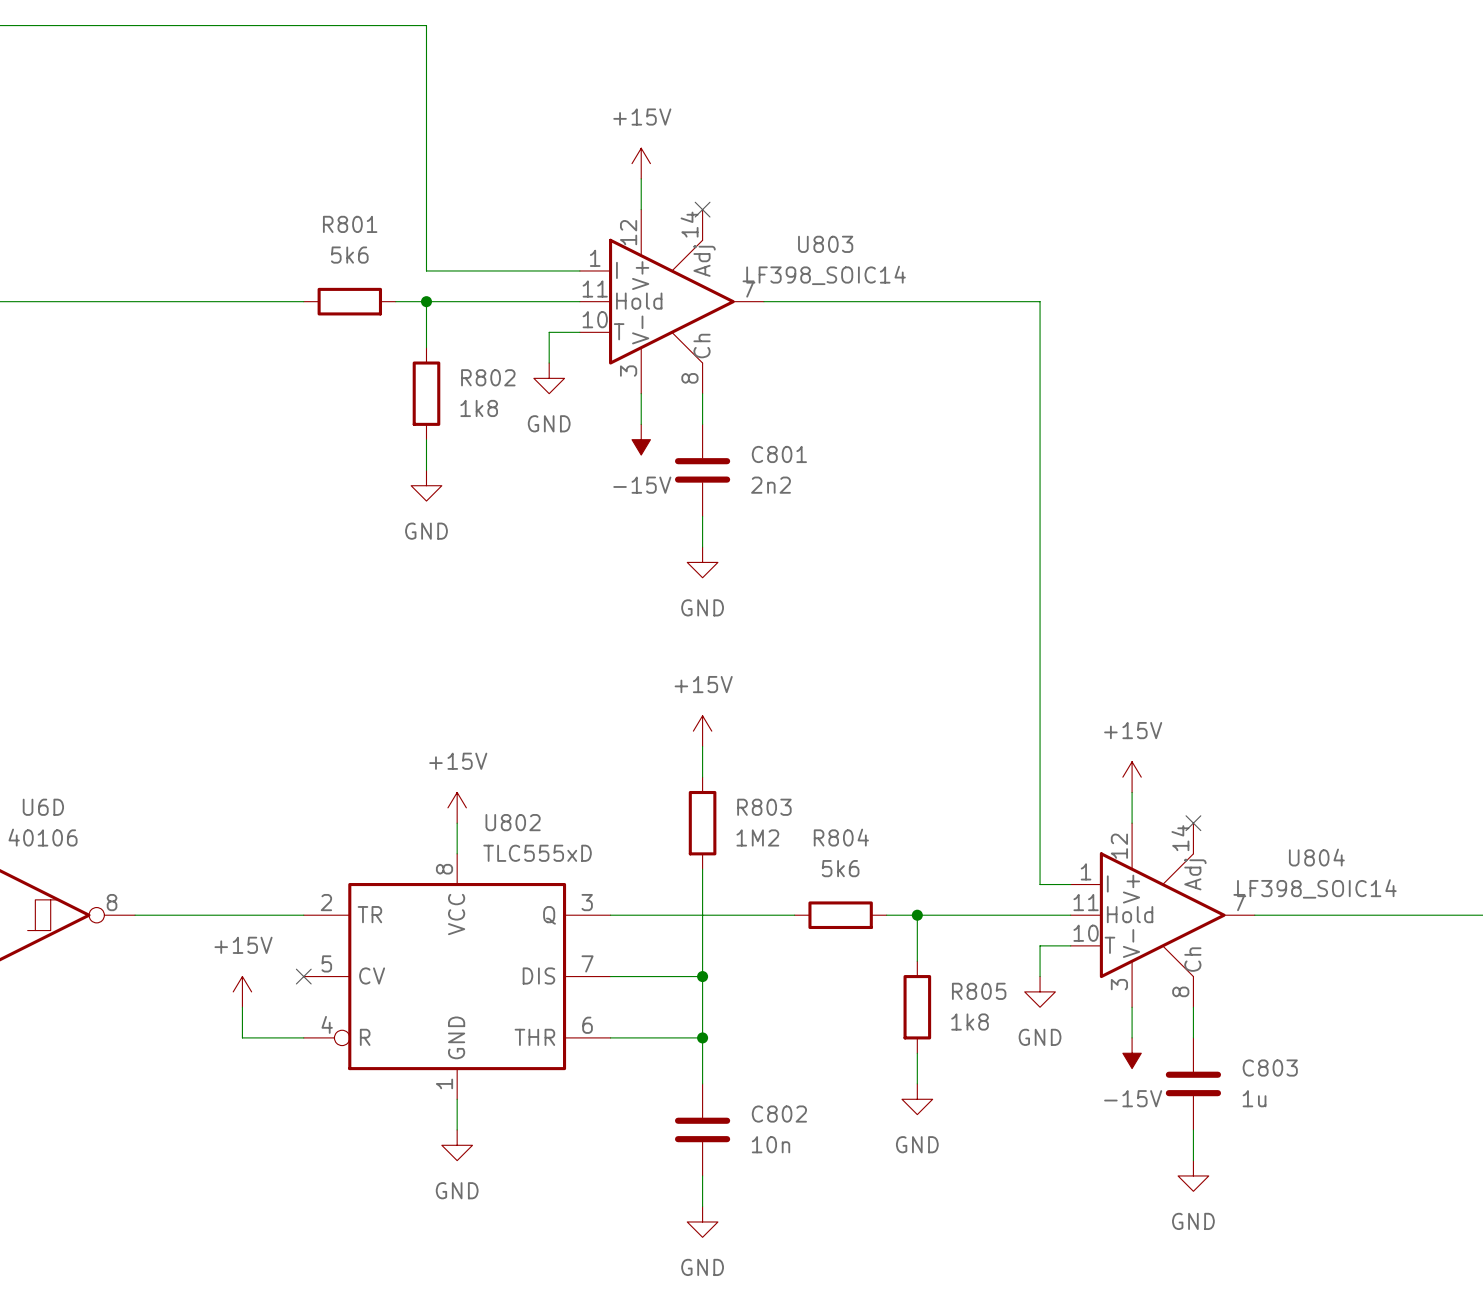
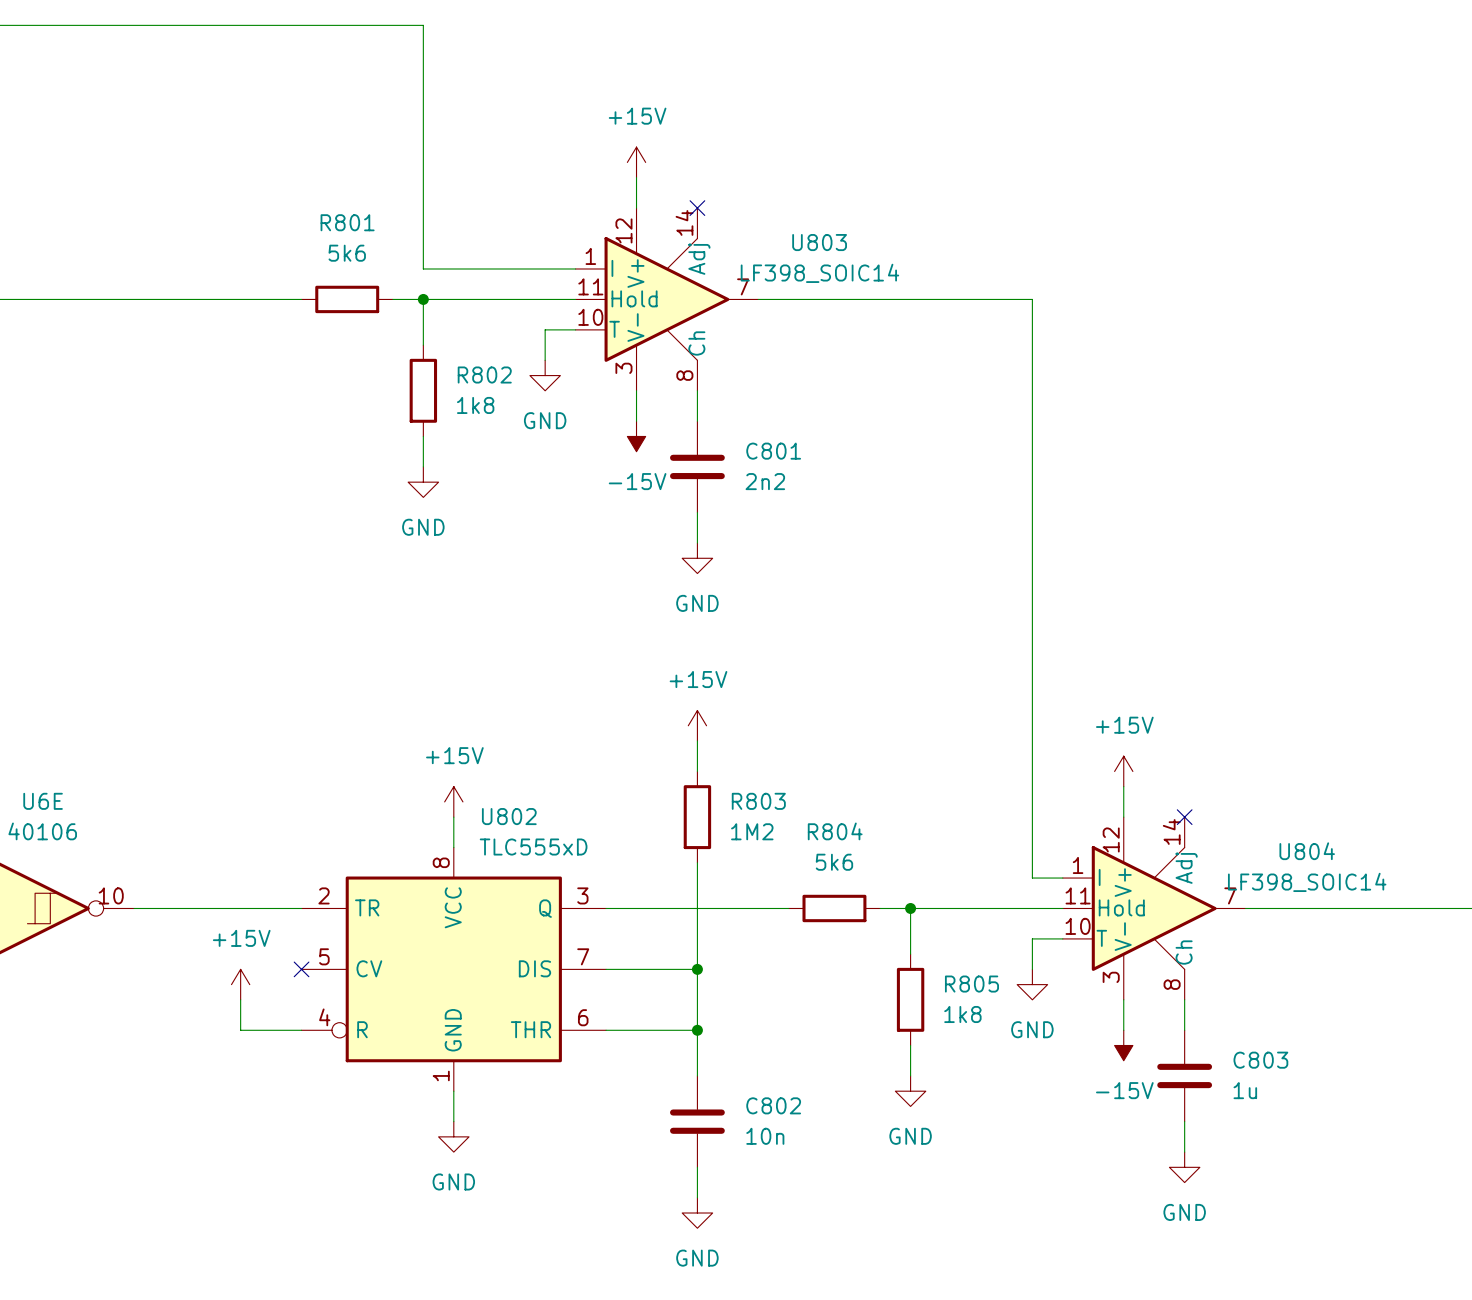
U6D name: U6D (43, 807) -> U6E (43, 801)
U6D pin number: 8 (112, 902) -> 10 (111, 895)

